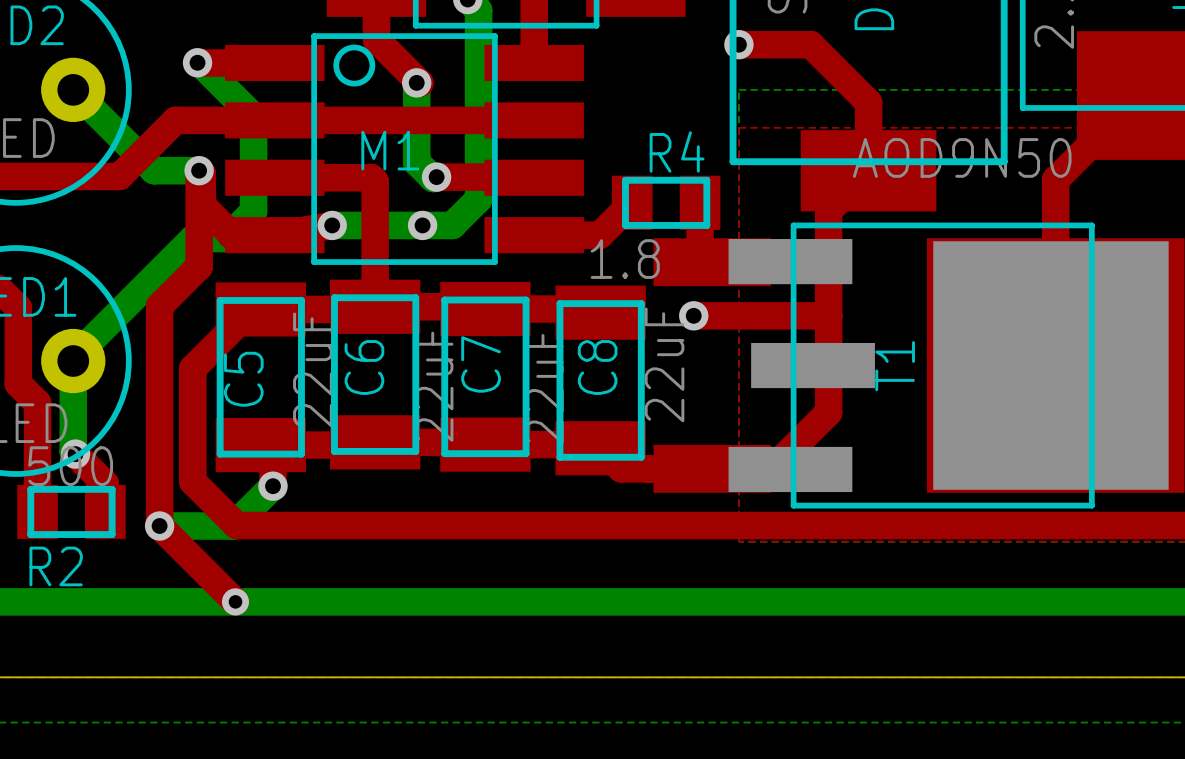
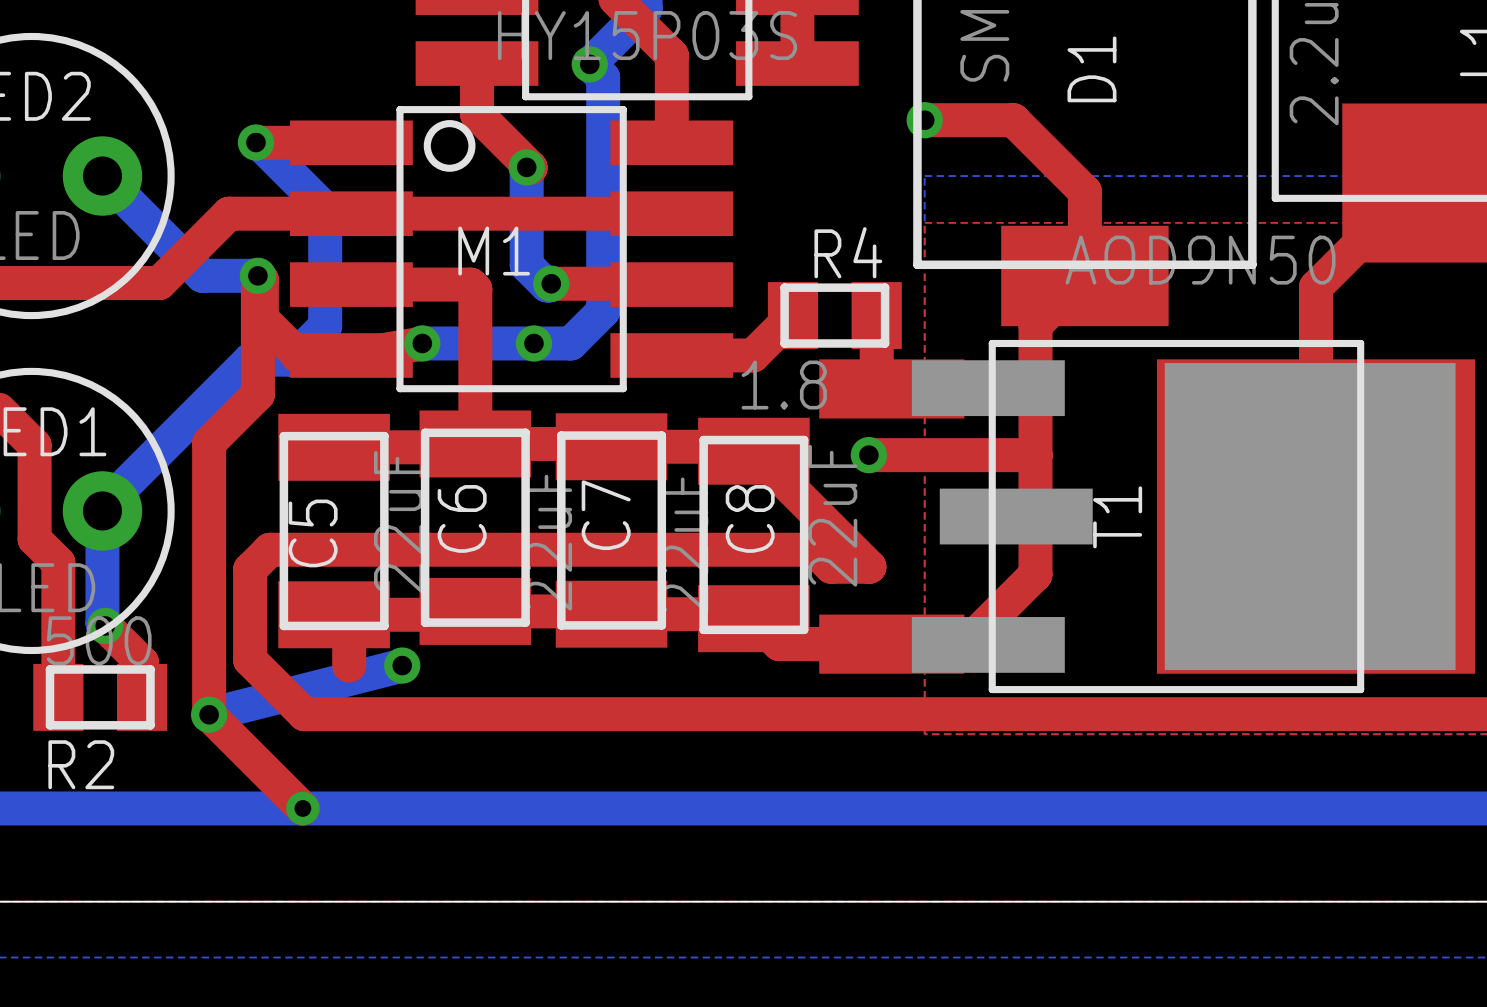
top track: (257, 304) (192, 368) (192, 408) -> (753, 451) (869, 566) (831, 566) (814, 549) (269, 549) (250, 569)
bottom track: (273, 486) (233, 525) (159, 525) -> (402, 665) (209, 714)
via position: (273, 486) -> (402, 665)

